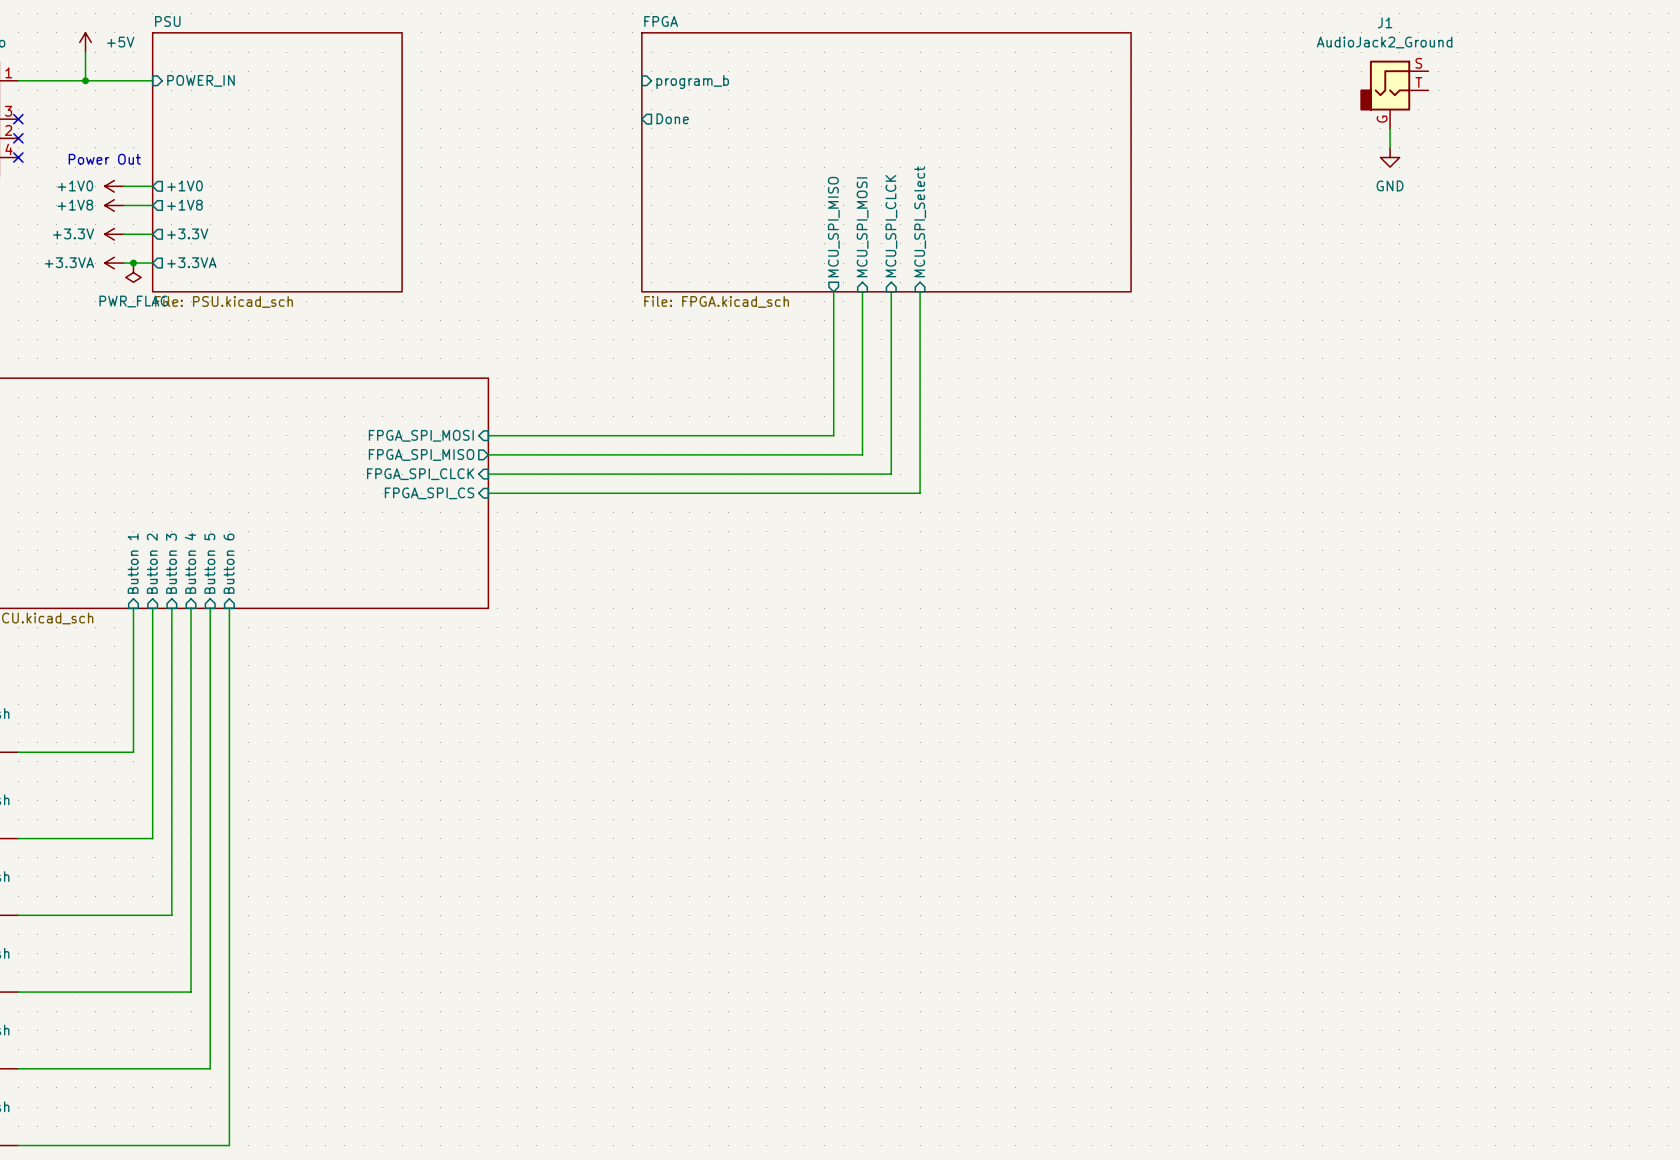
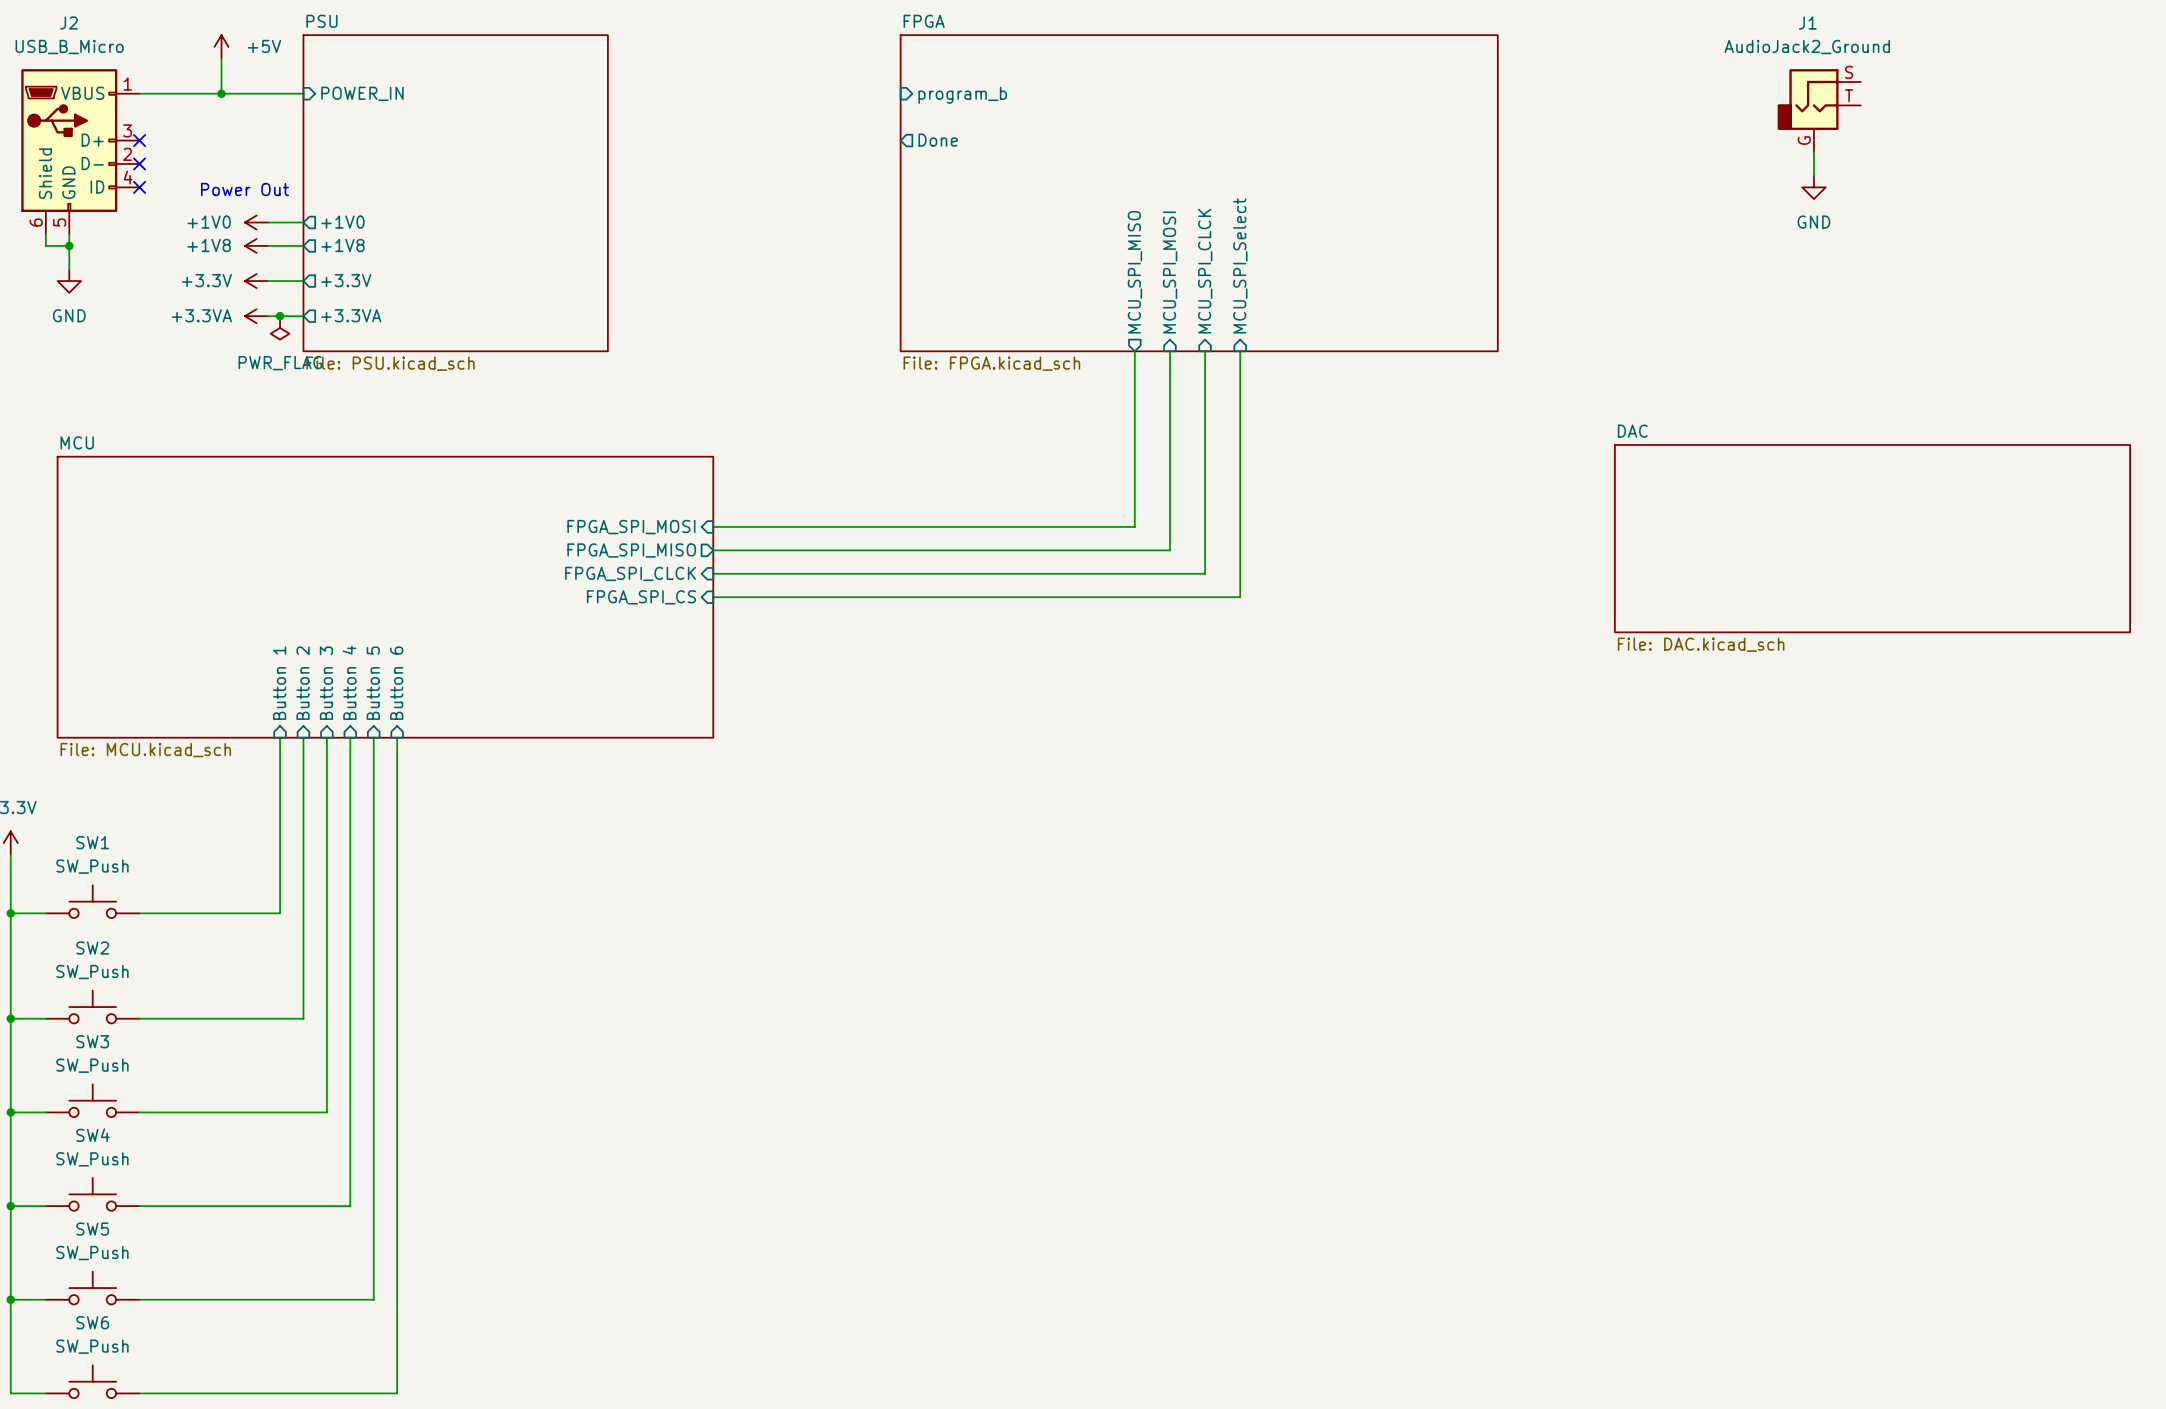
sheet DAC: none -> File: DAC.kicad_sch (1872, 538)

